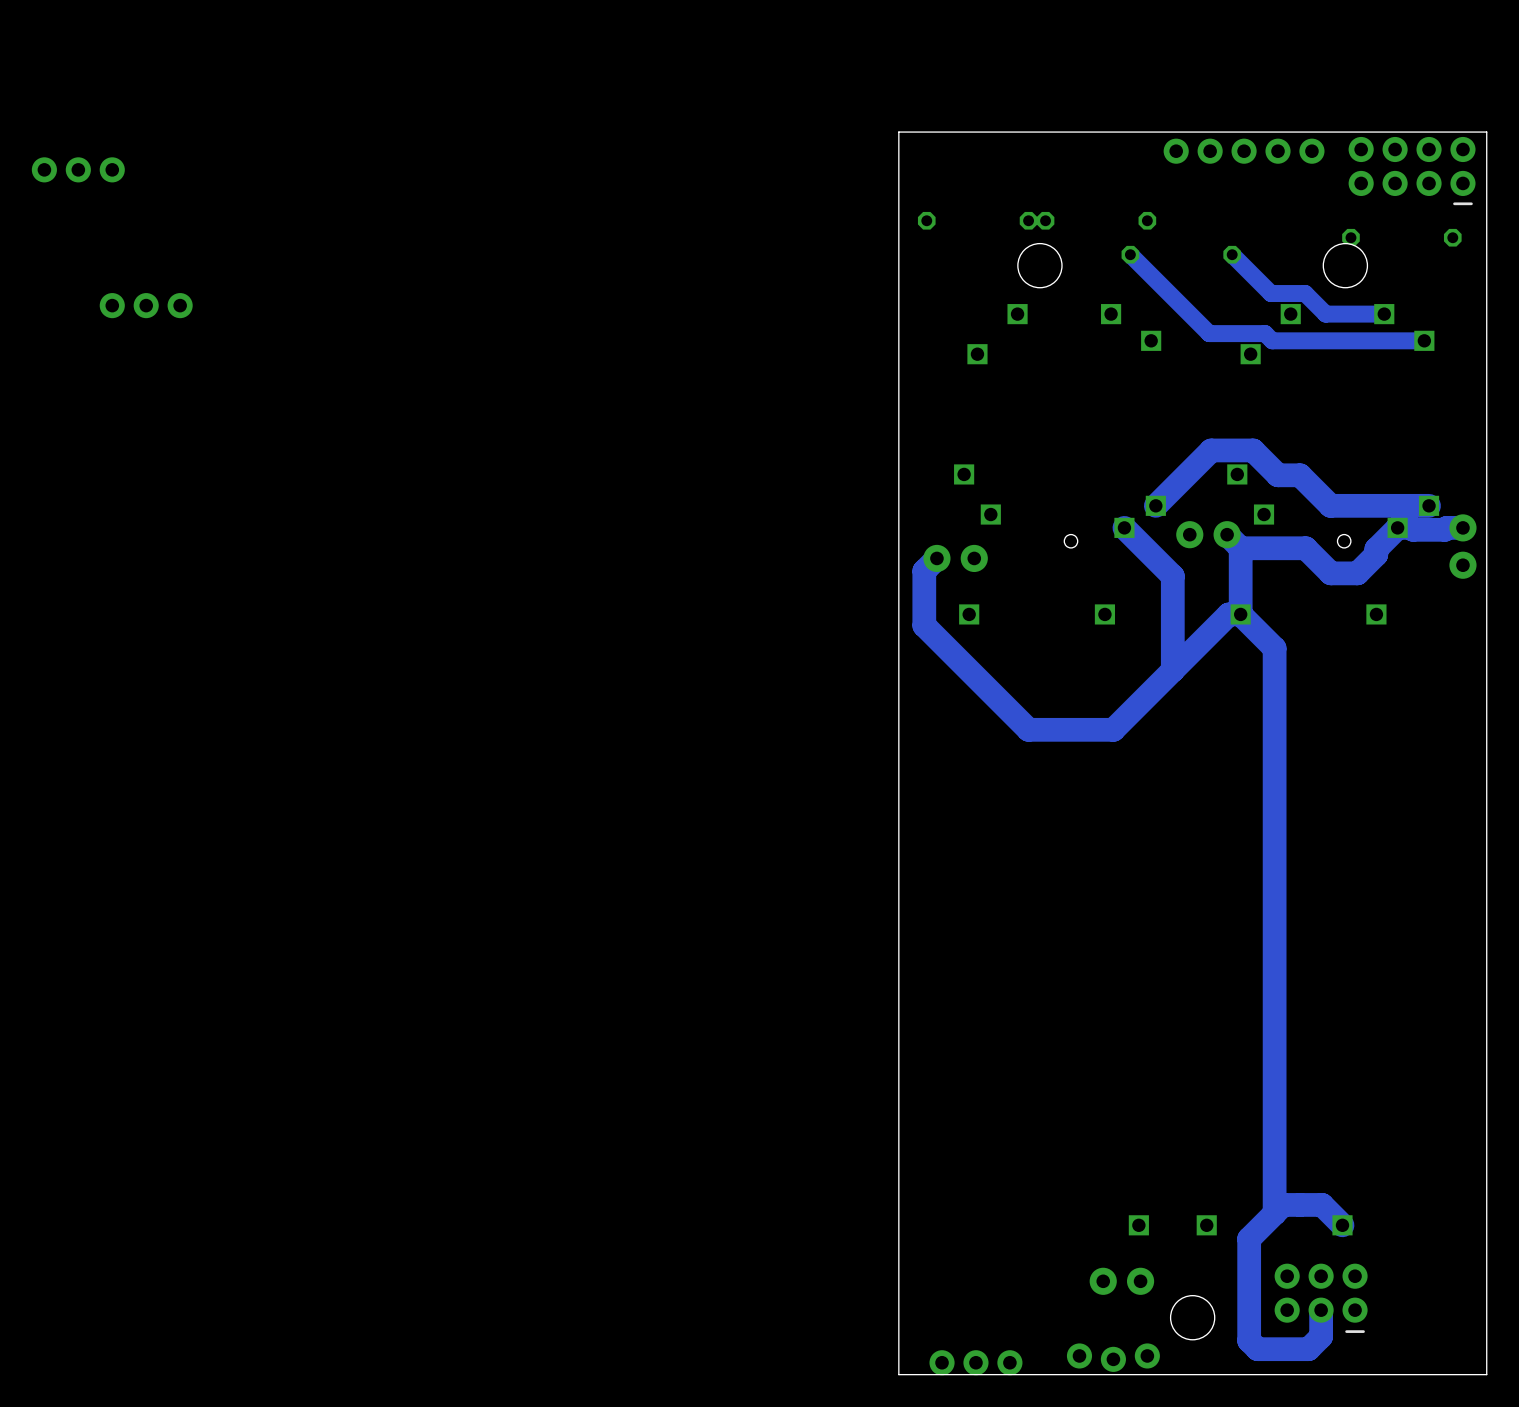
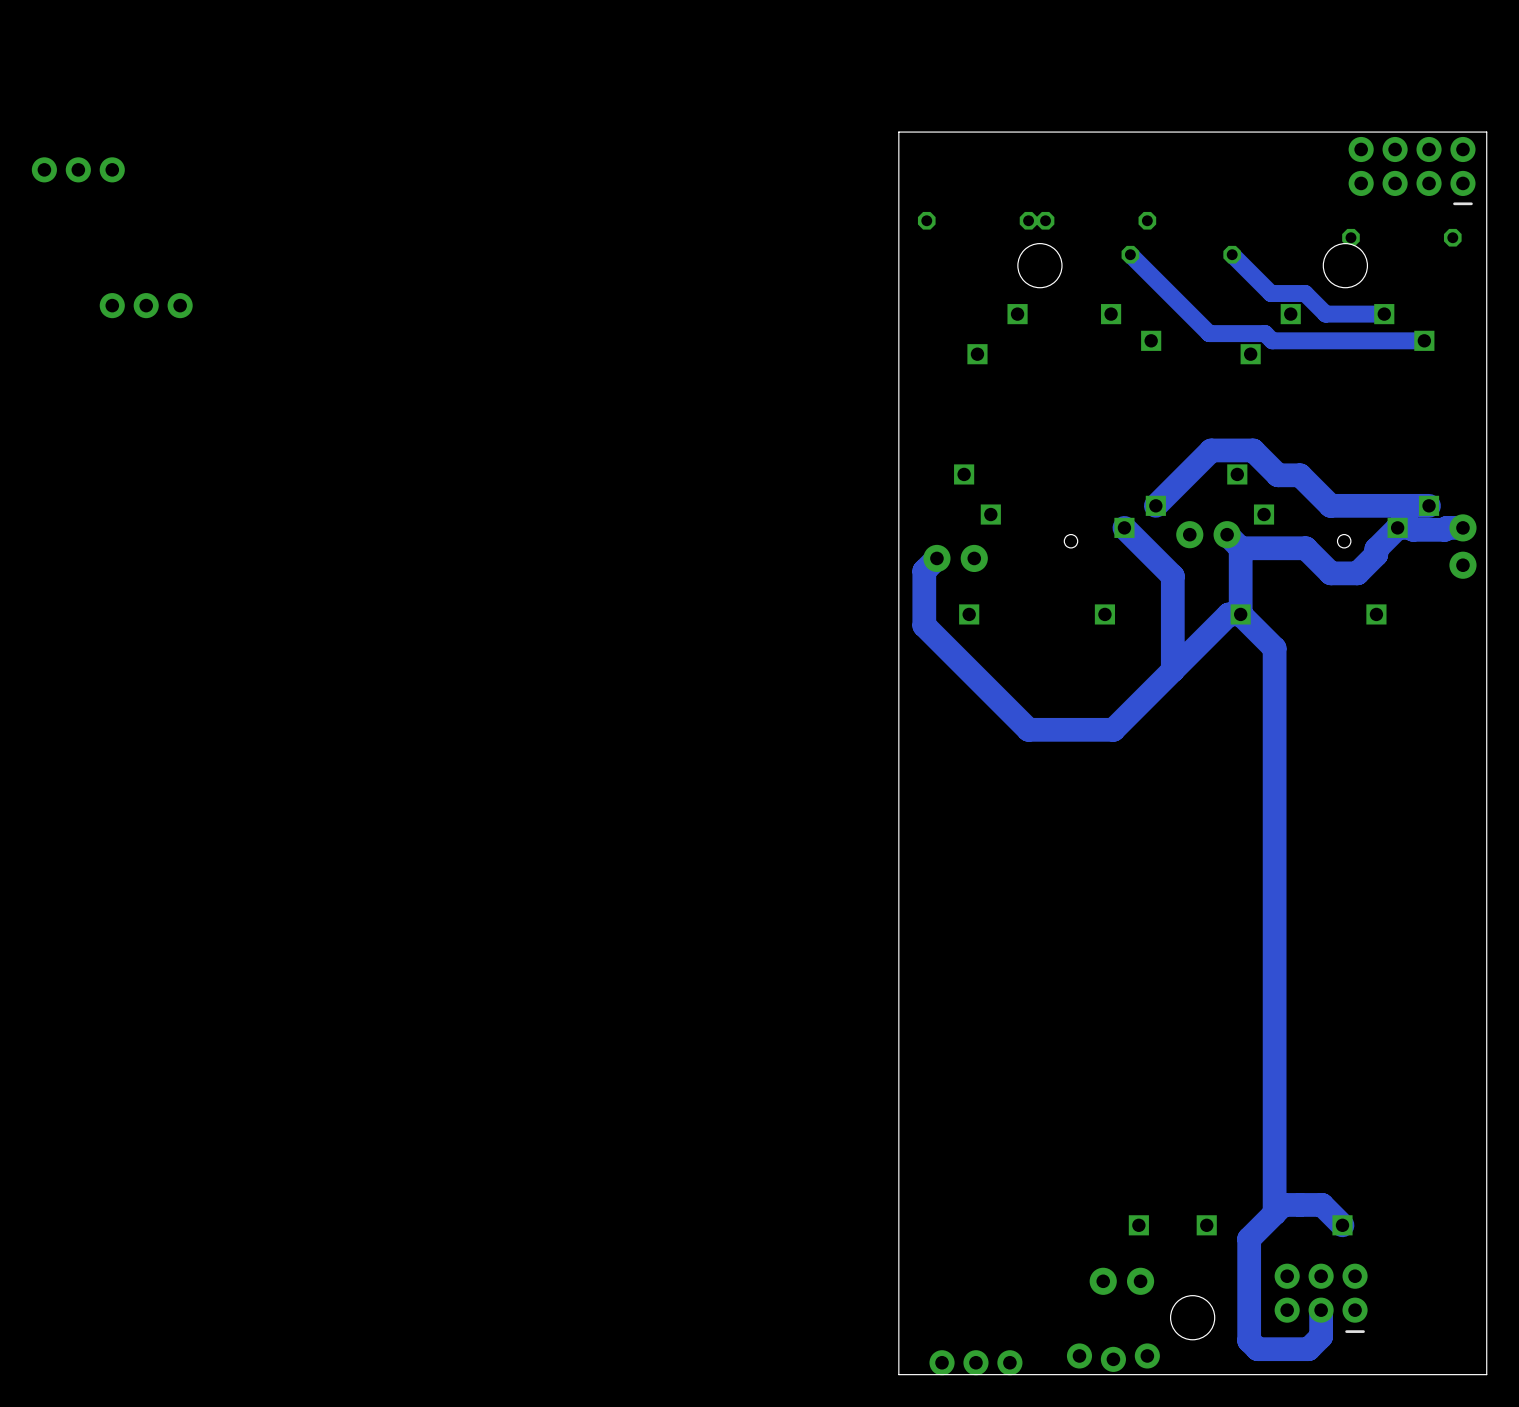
part: (1244, 151) -> none

